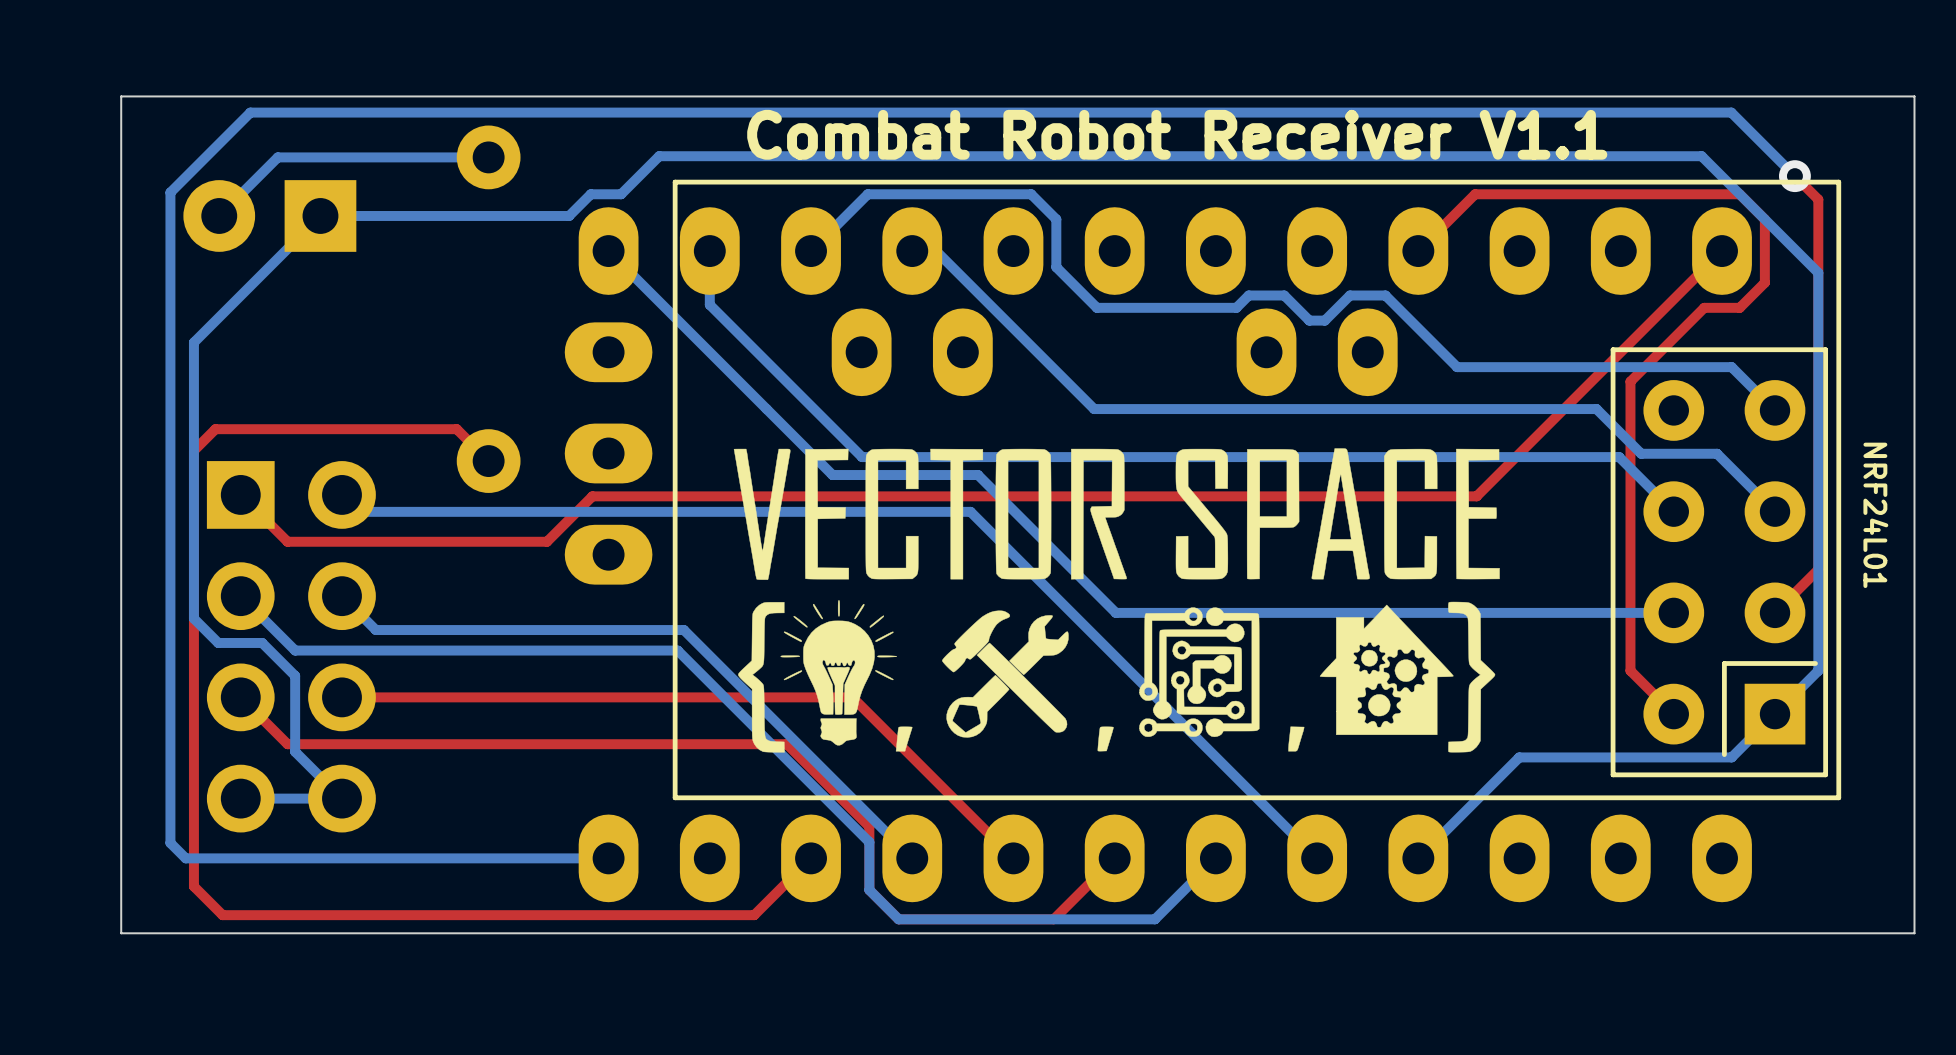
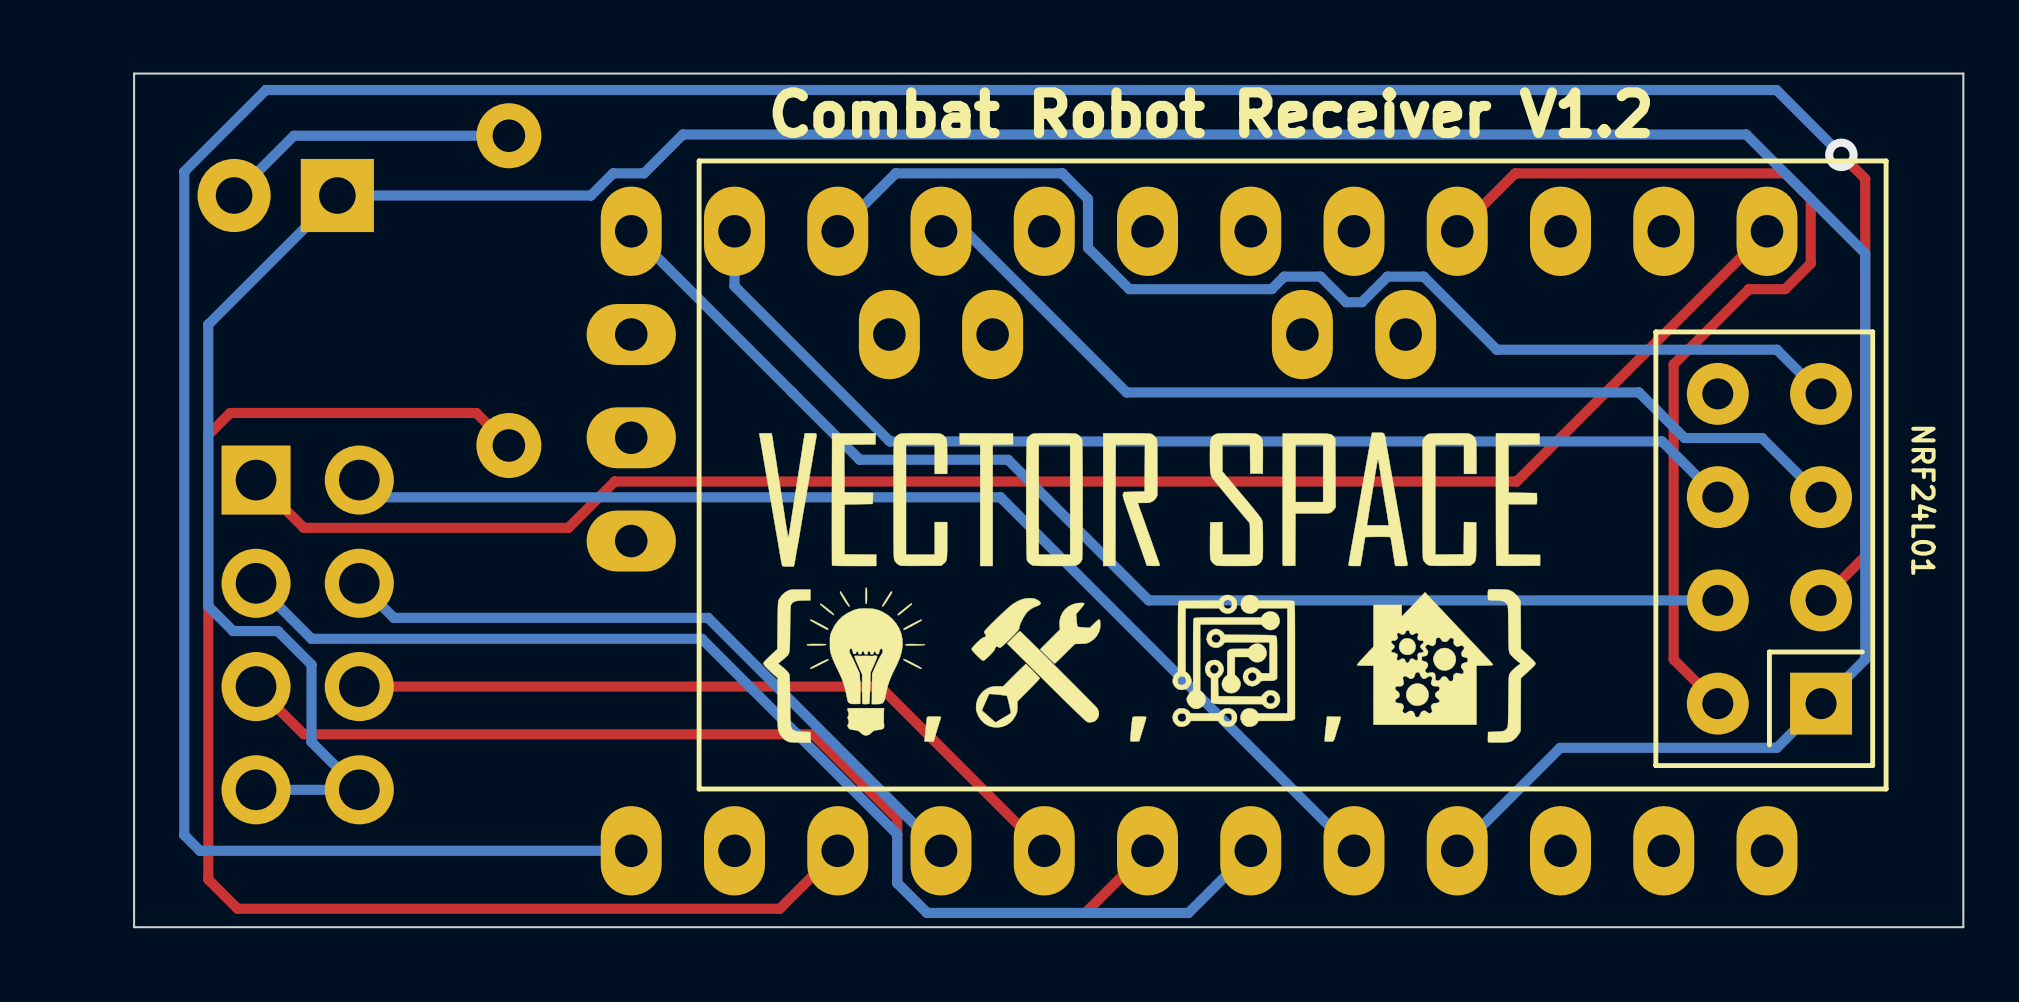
text: Combat Robot Receiver V1.1 (1177, 134) -> Combat Robot Receiver V1.2 (1211, 112)

